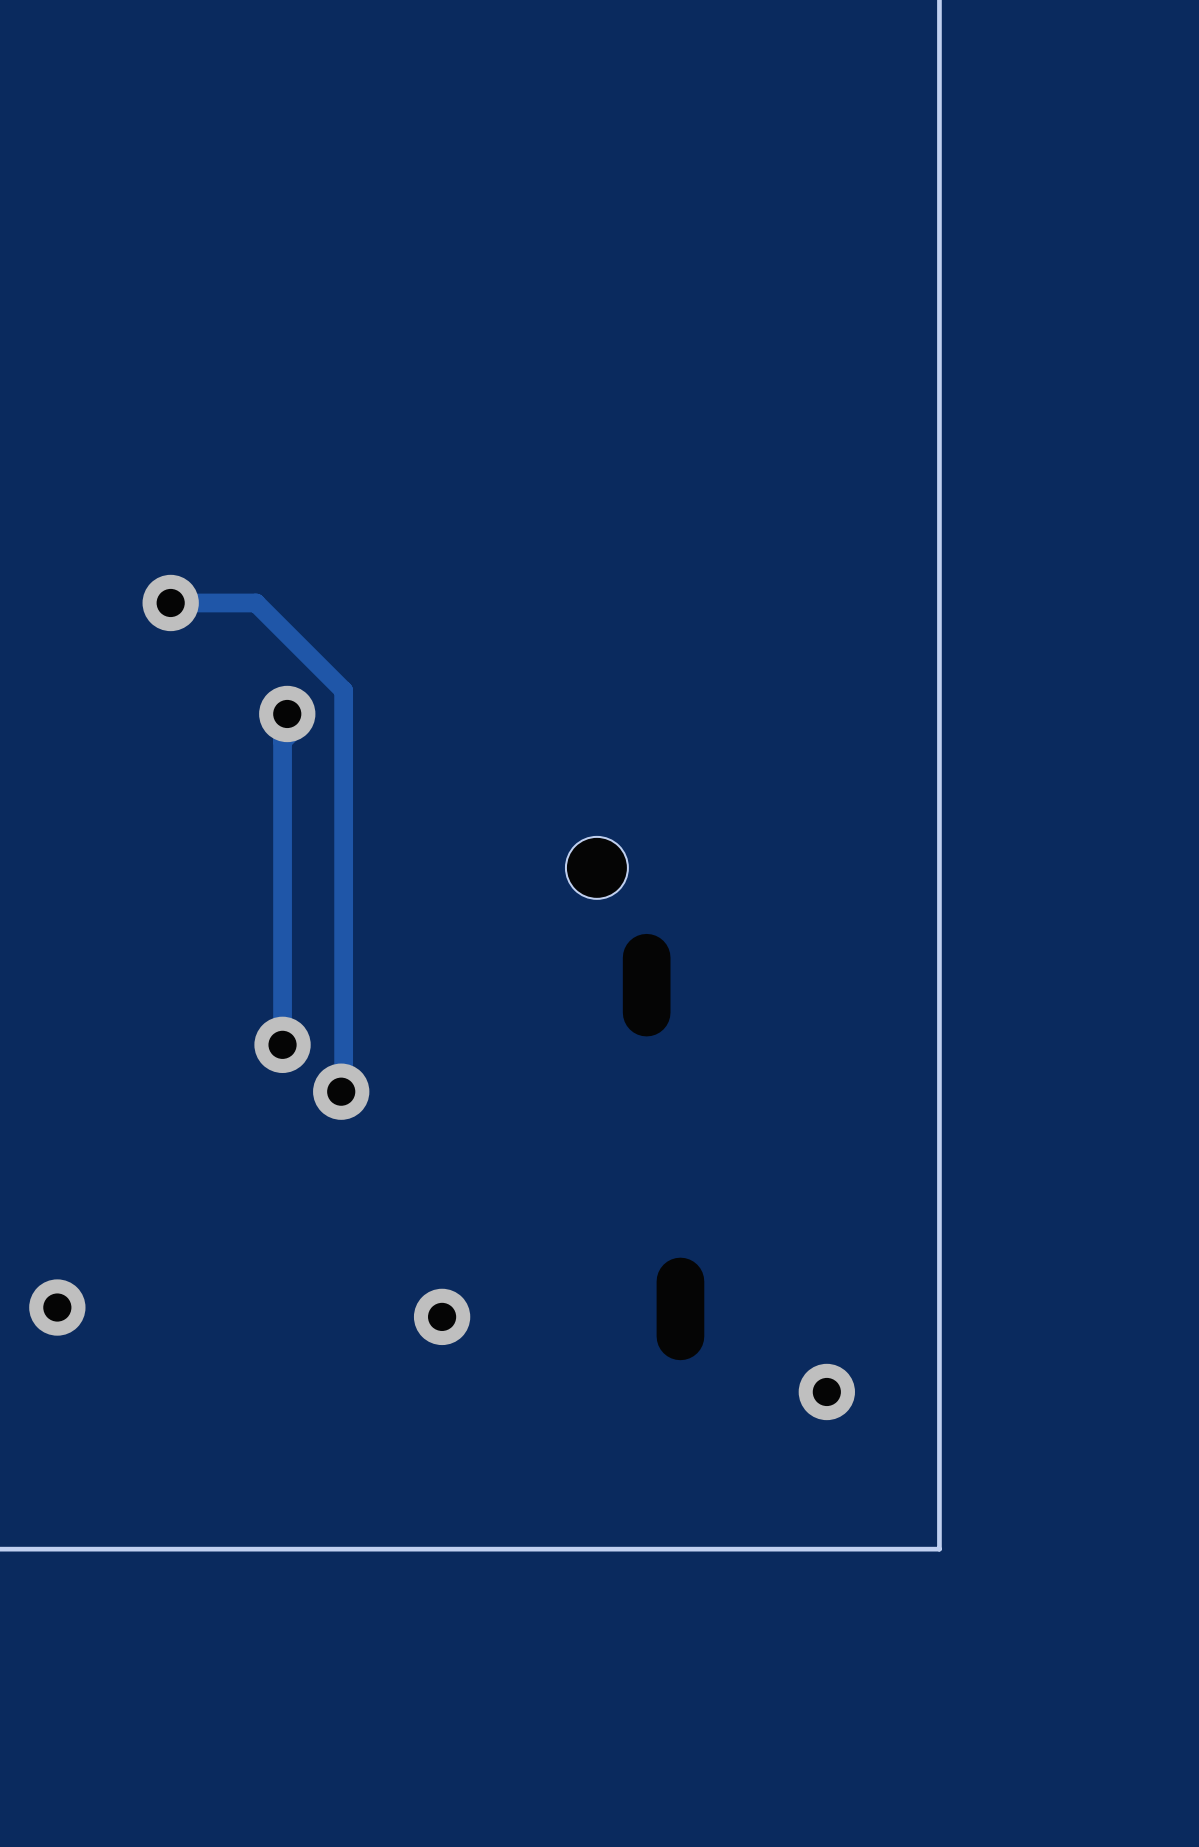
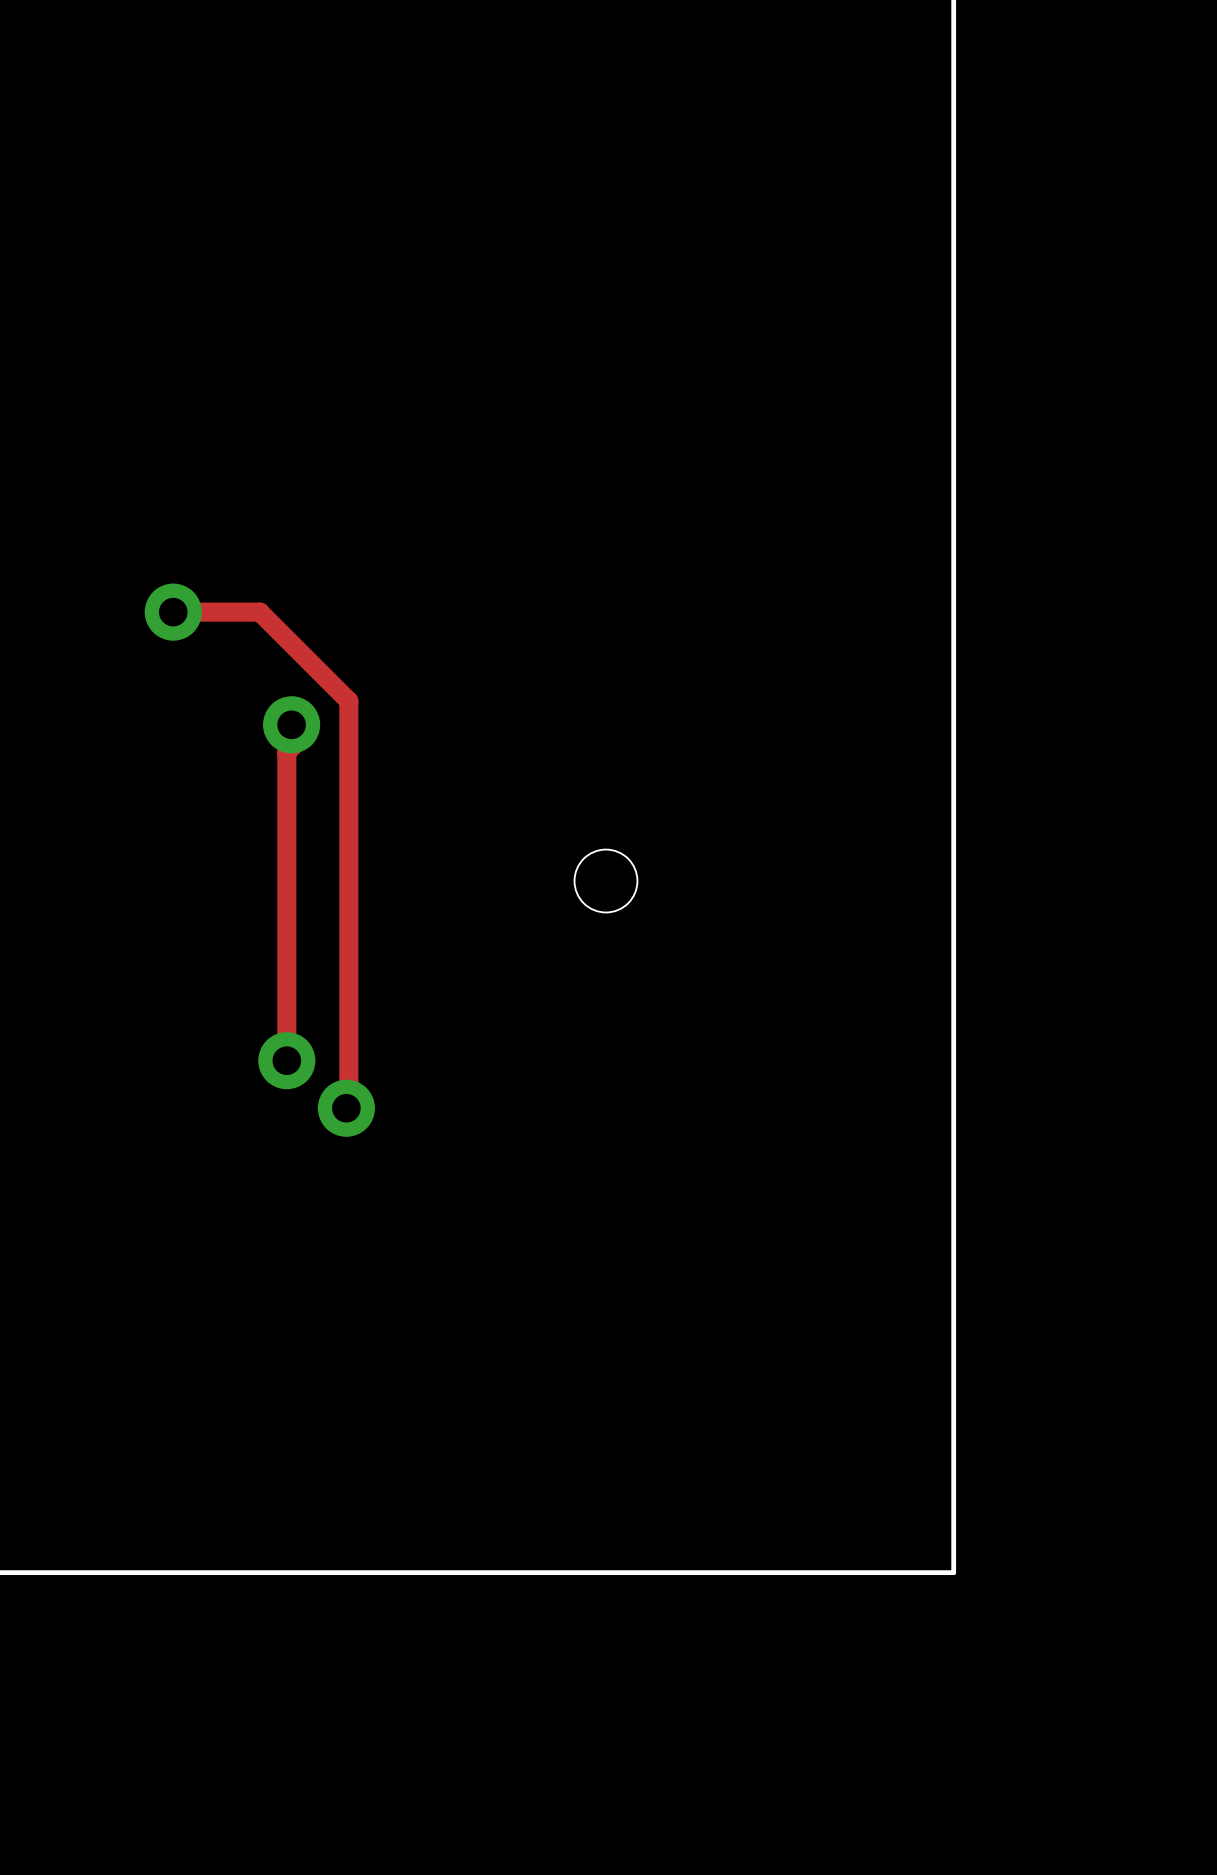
via: (57, 1307) -> none
via: (442, 1316) -> none
via: (826, 1391) -> none

